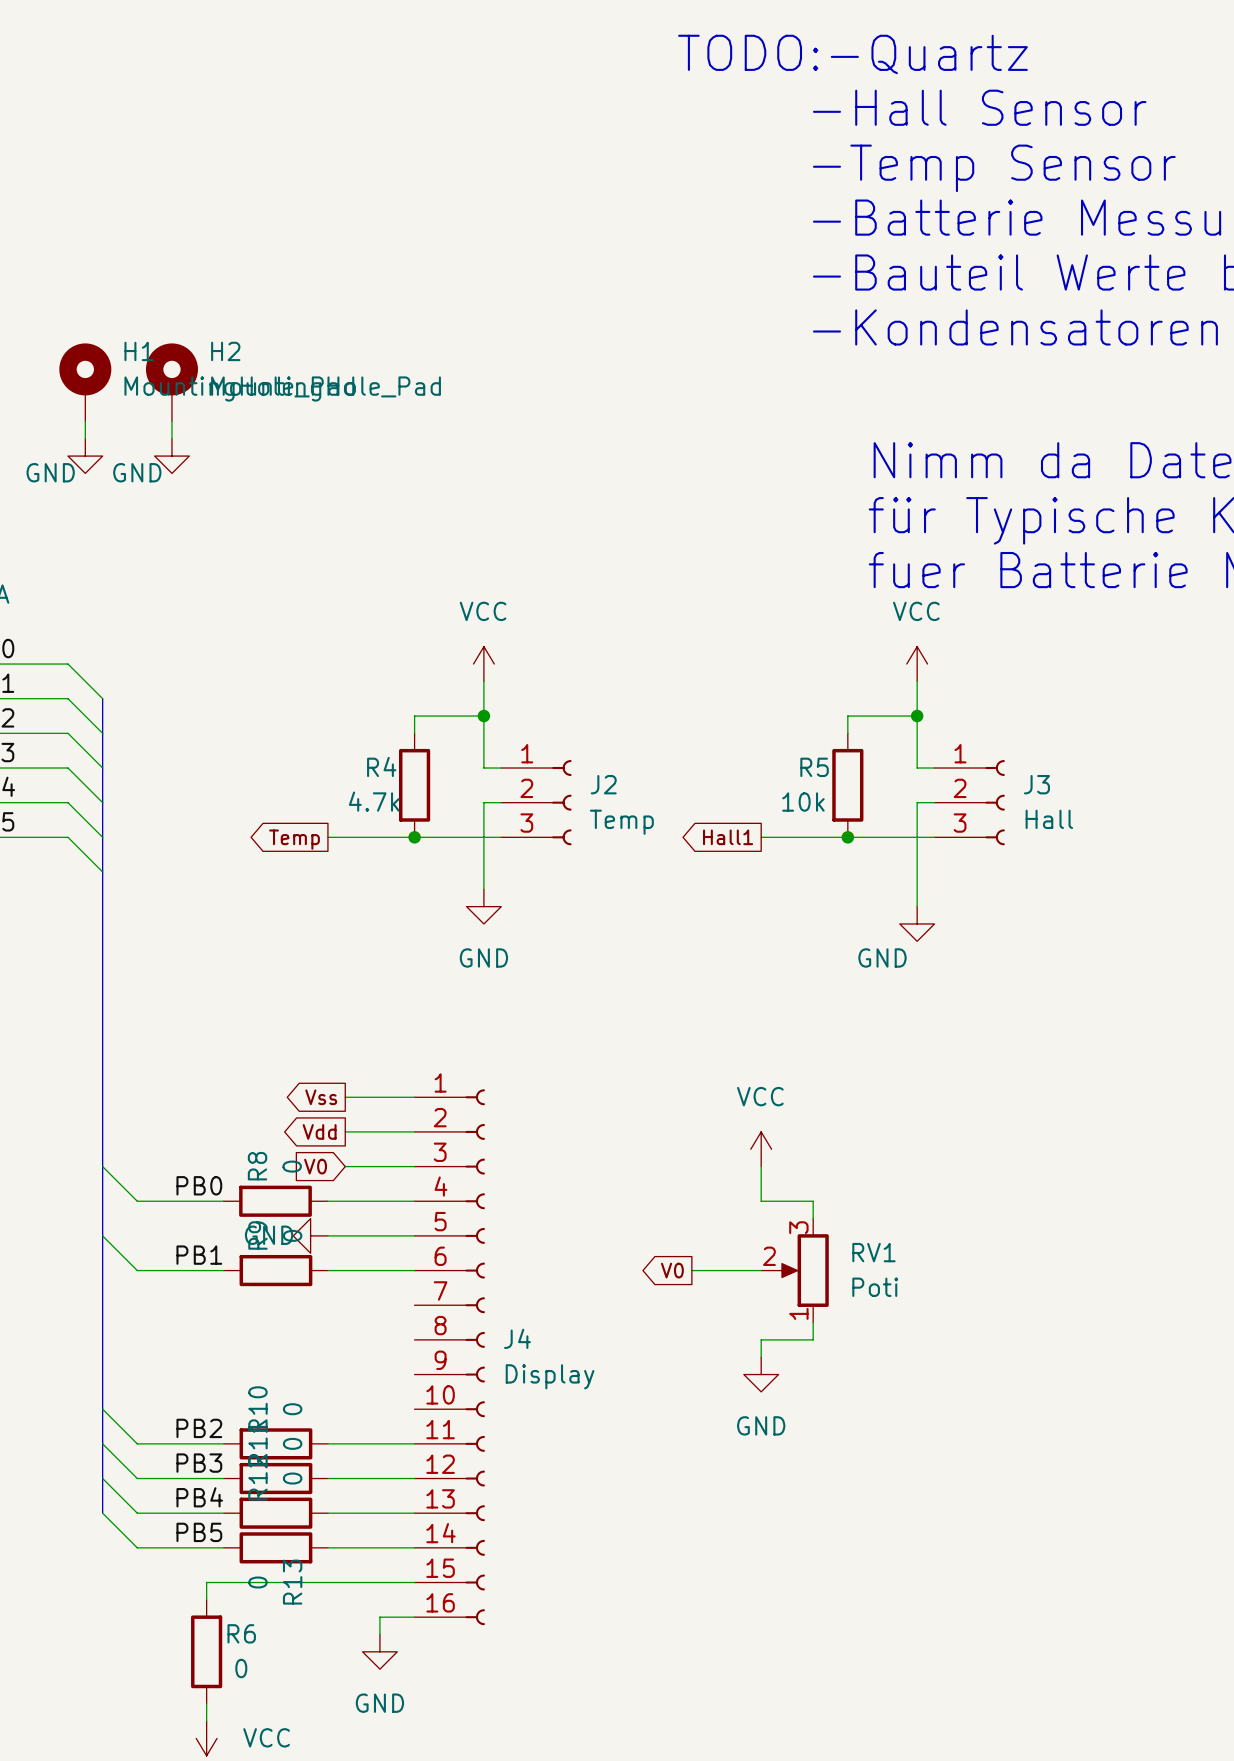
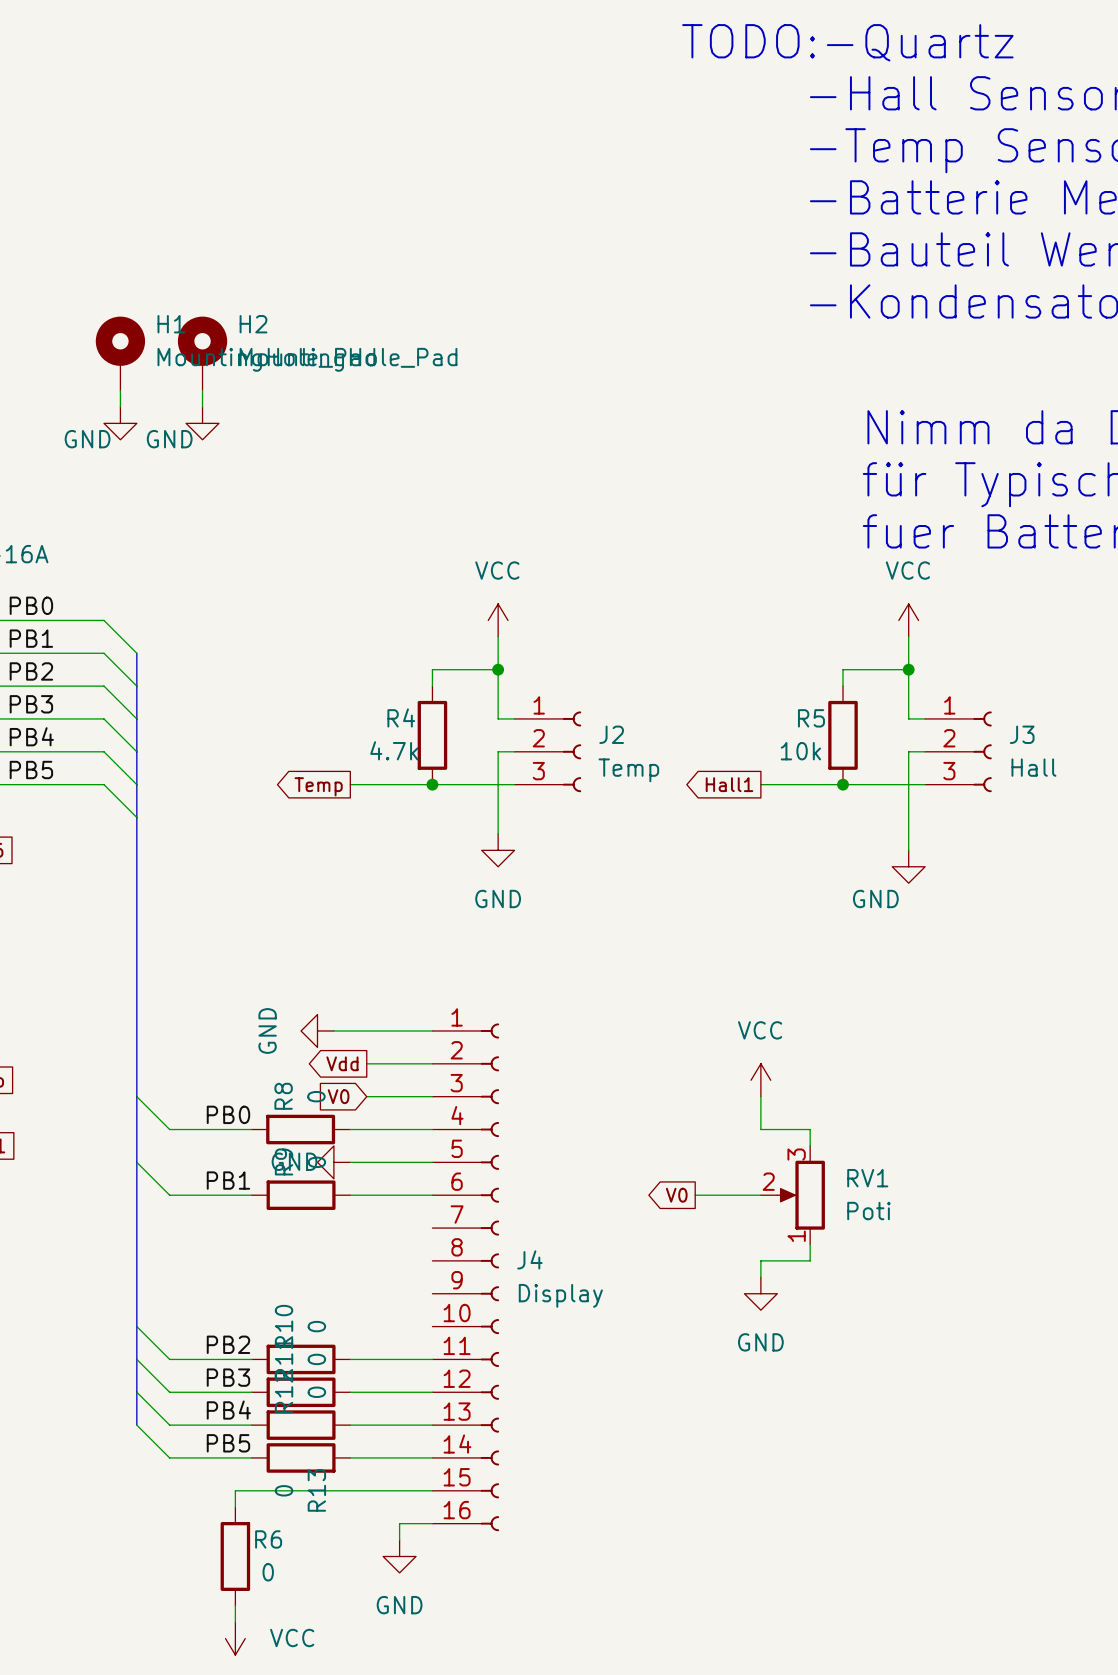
power symbol: none -> GND (317, 1030)
wire: none -> (333, 1030) (366, 1030)
global label: Vss (321, 1097) -> none

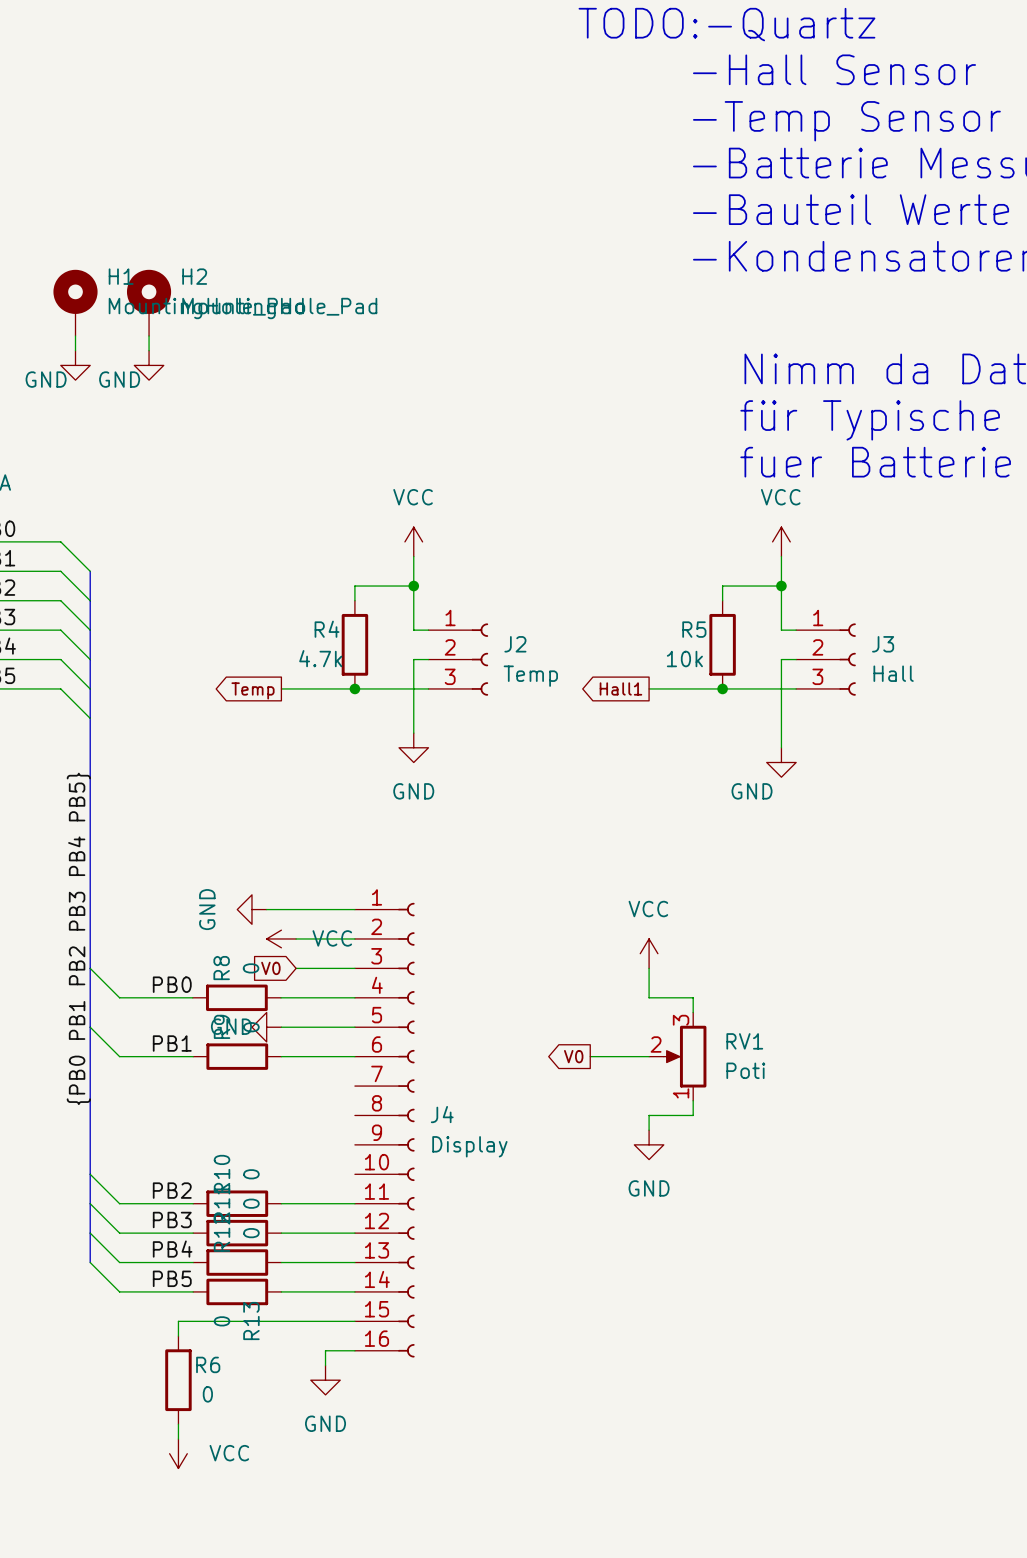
label: none -> {PB0 PB1 PB2 PB3 PB4 PB5} (78, 938)
global label: Vdd (342, 1063) -> none
power symbol: none -> VCC (281, 938)

